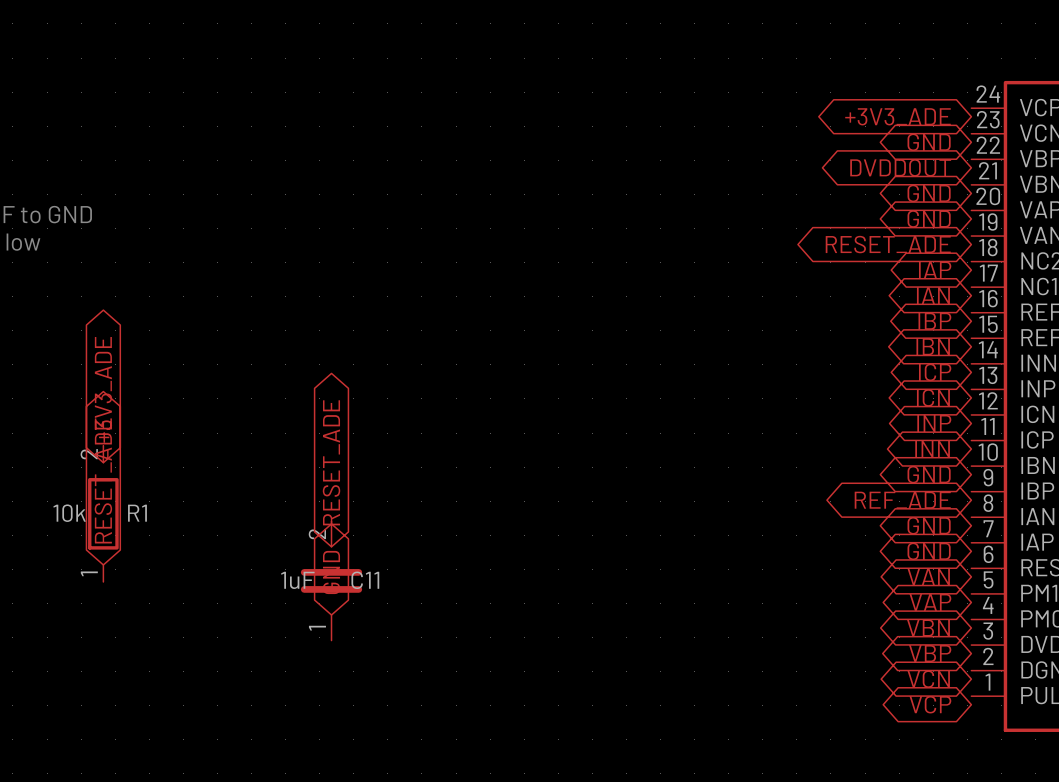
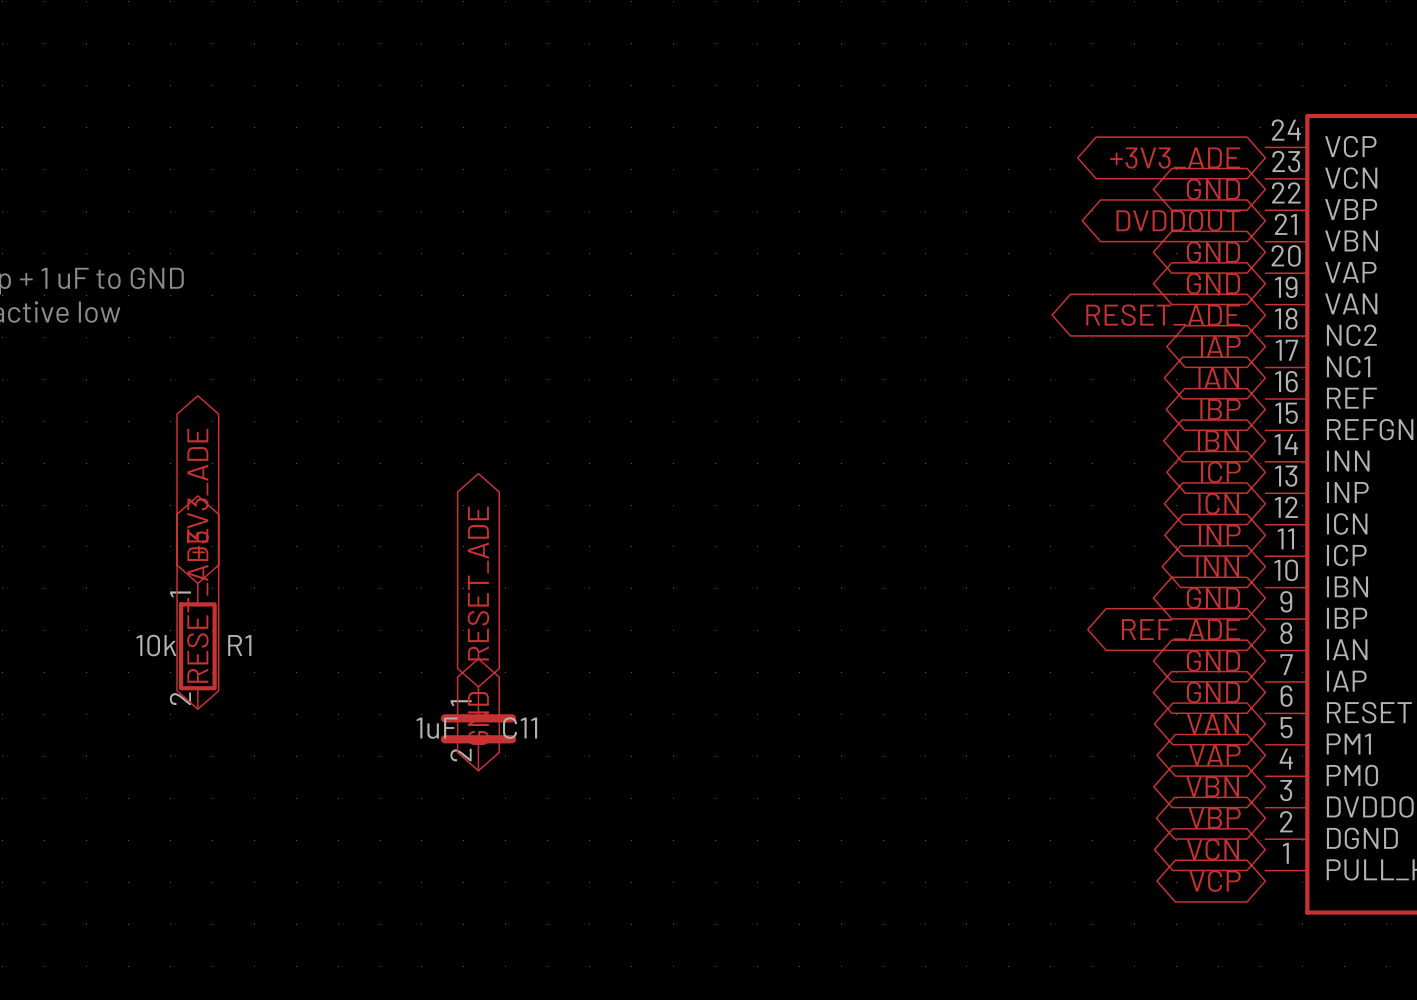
R1 symbol: [88, 445, 119, 582] -> [178, 583, 217, 710]
C11 symbol: [300, 521, 363, 641] -> [440, 686, 517, 771]

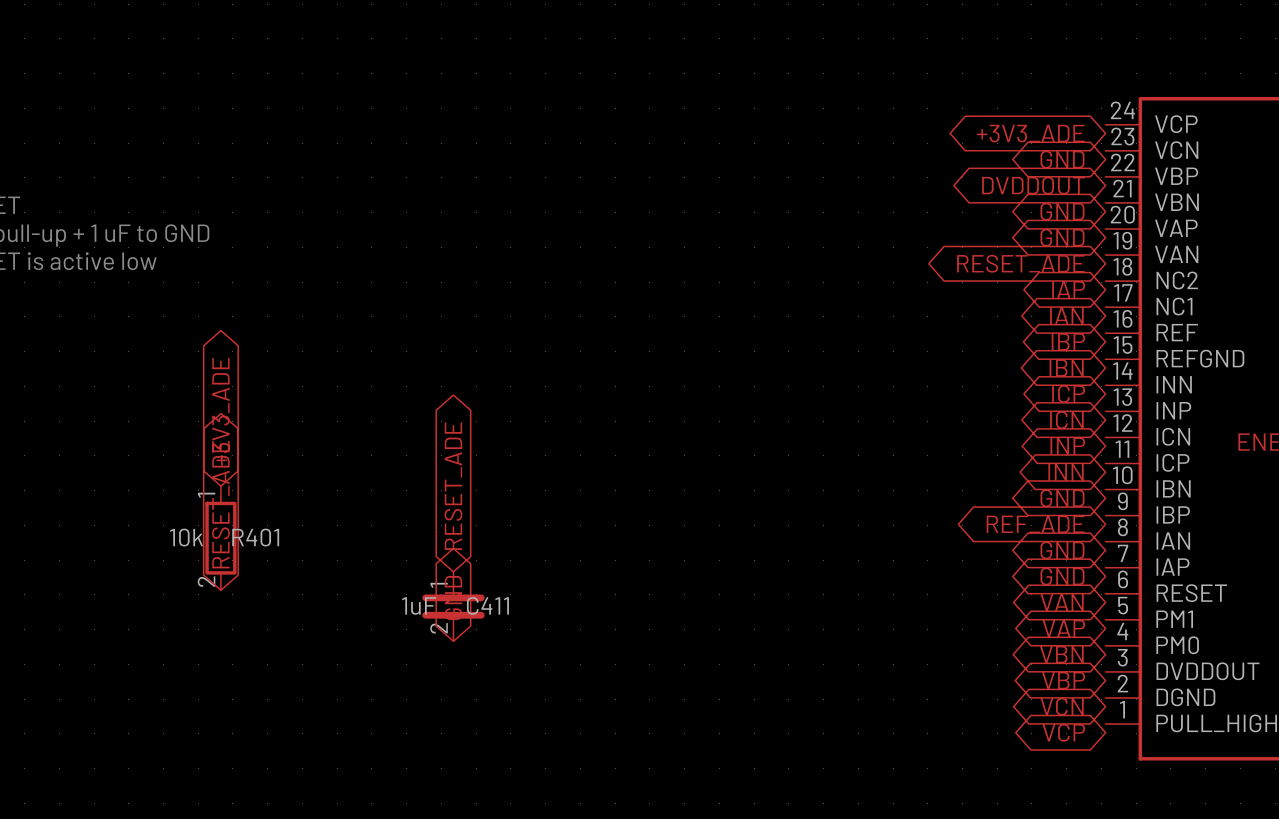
R1 name: R1 (239, 645) -> R401 (255, 537)
C11 name: C11 (520, 728) -> C411 (487, 605)

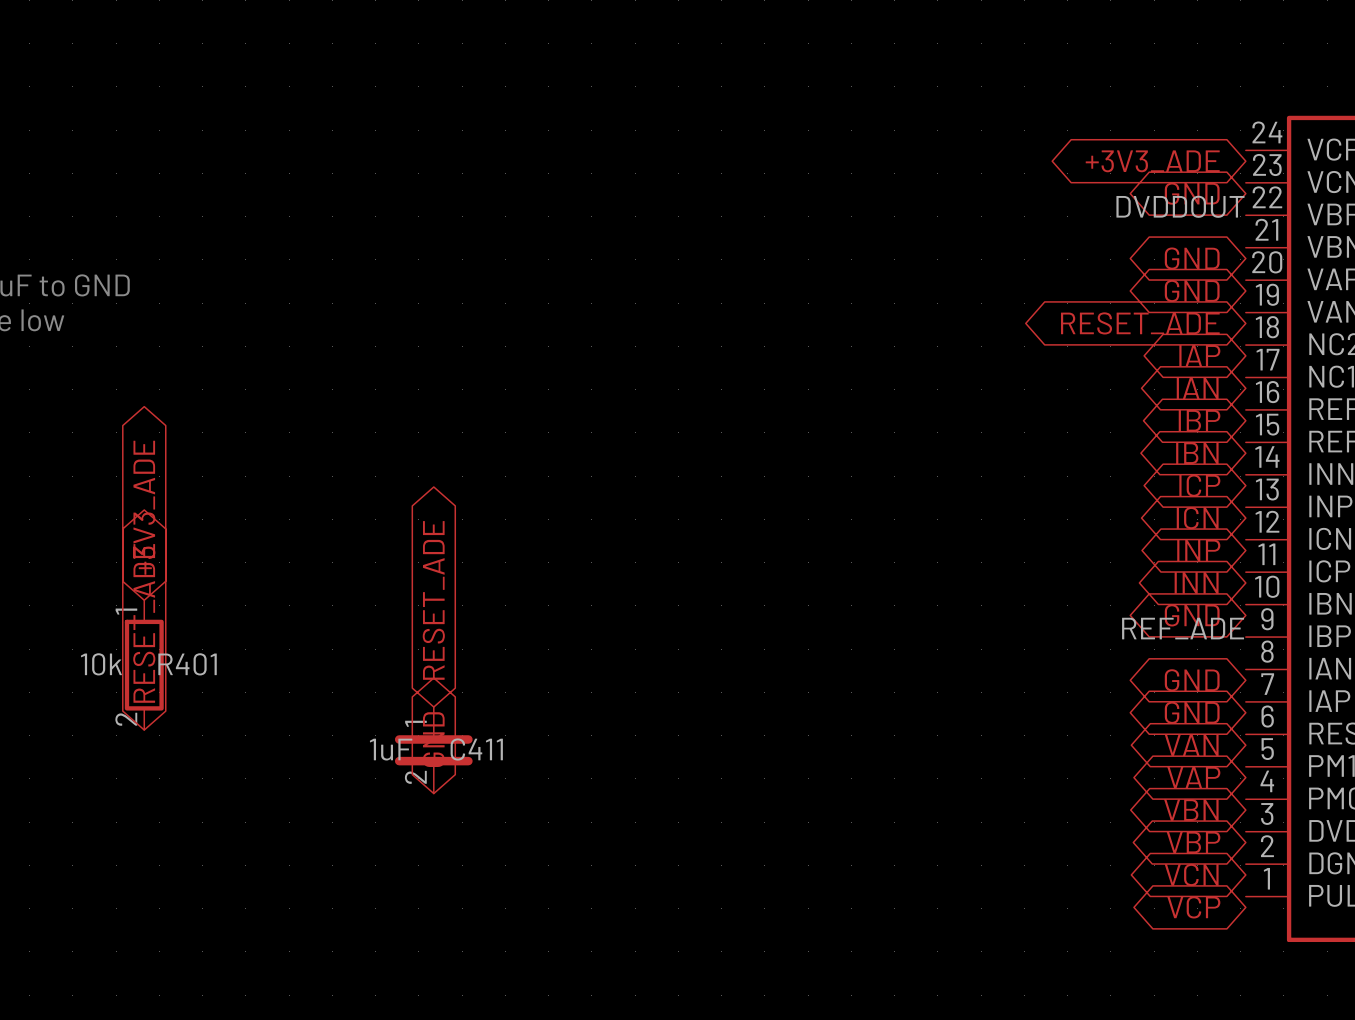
label: none -> DVDDOUT (1180, 206)
global label: DVDDOUT (1033, 185) -> none
label: none -> REF_ADE (1183, 628)
global label: REF_ADE (1035, 524) -> none

